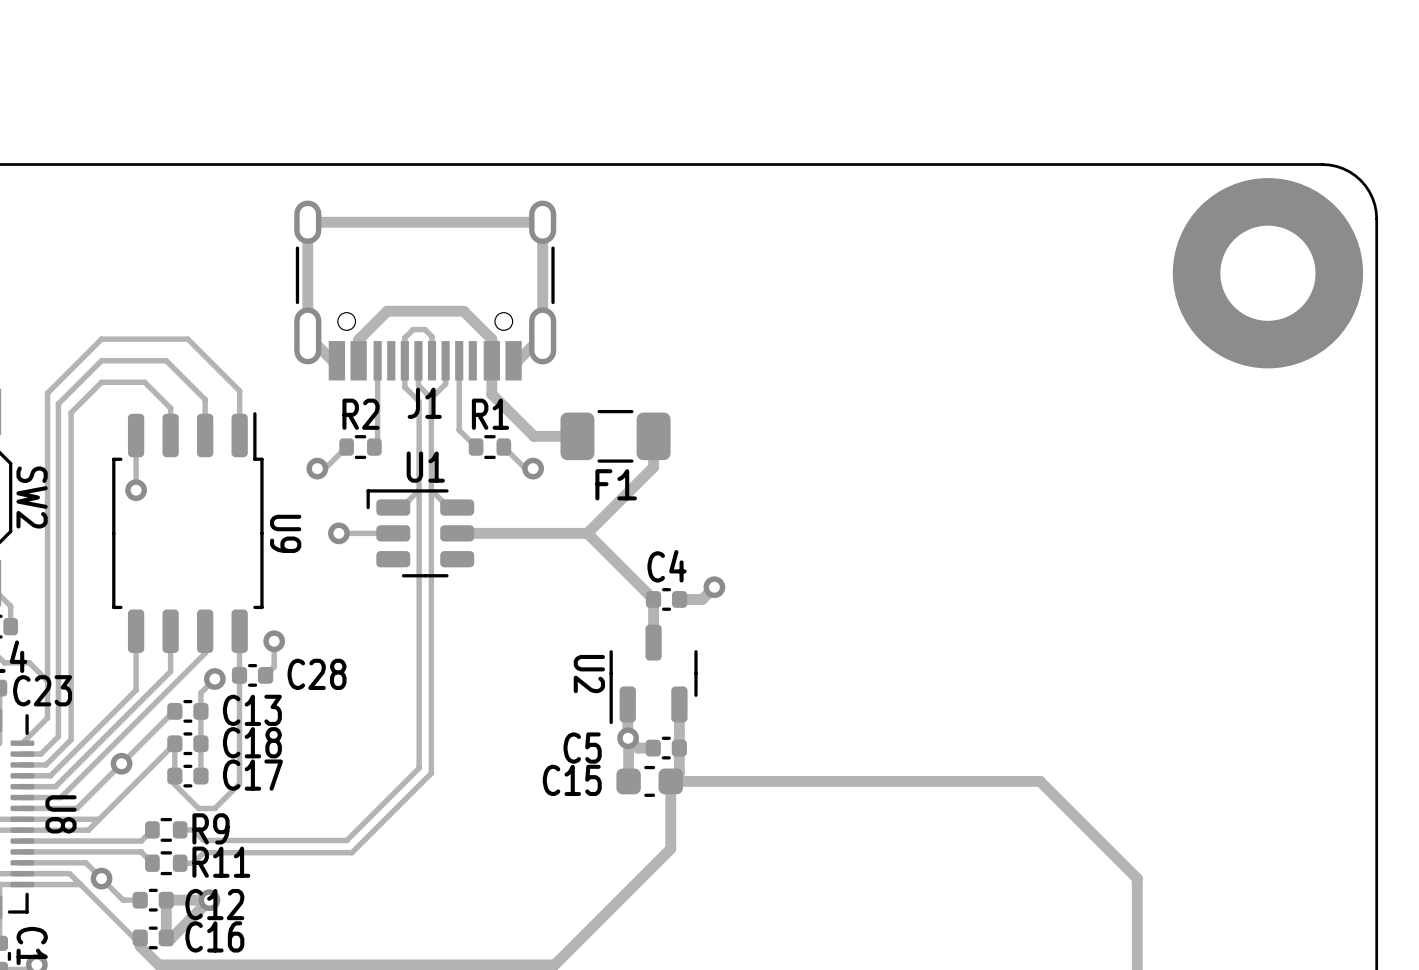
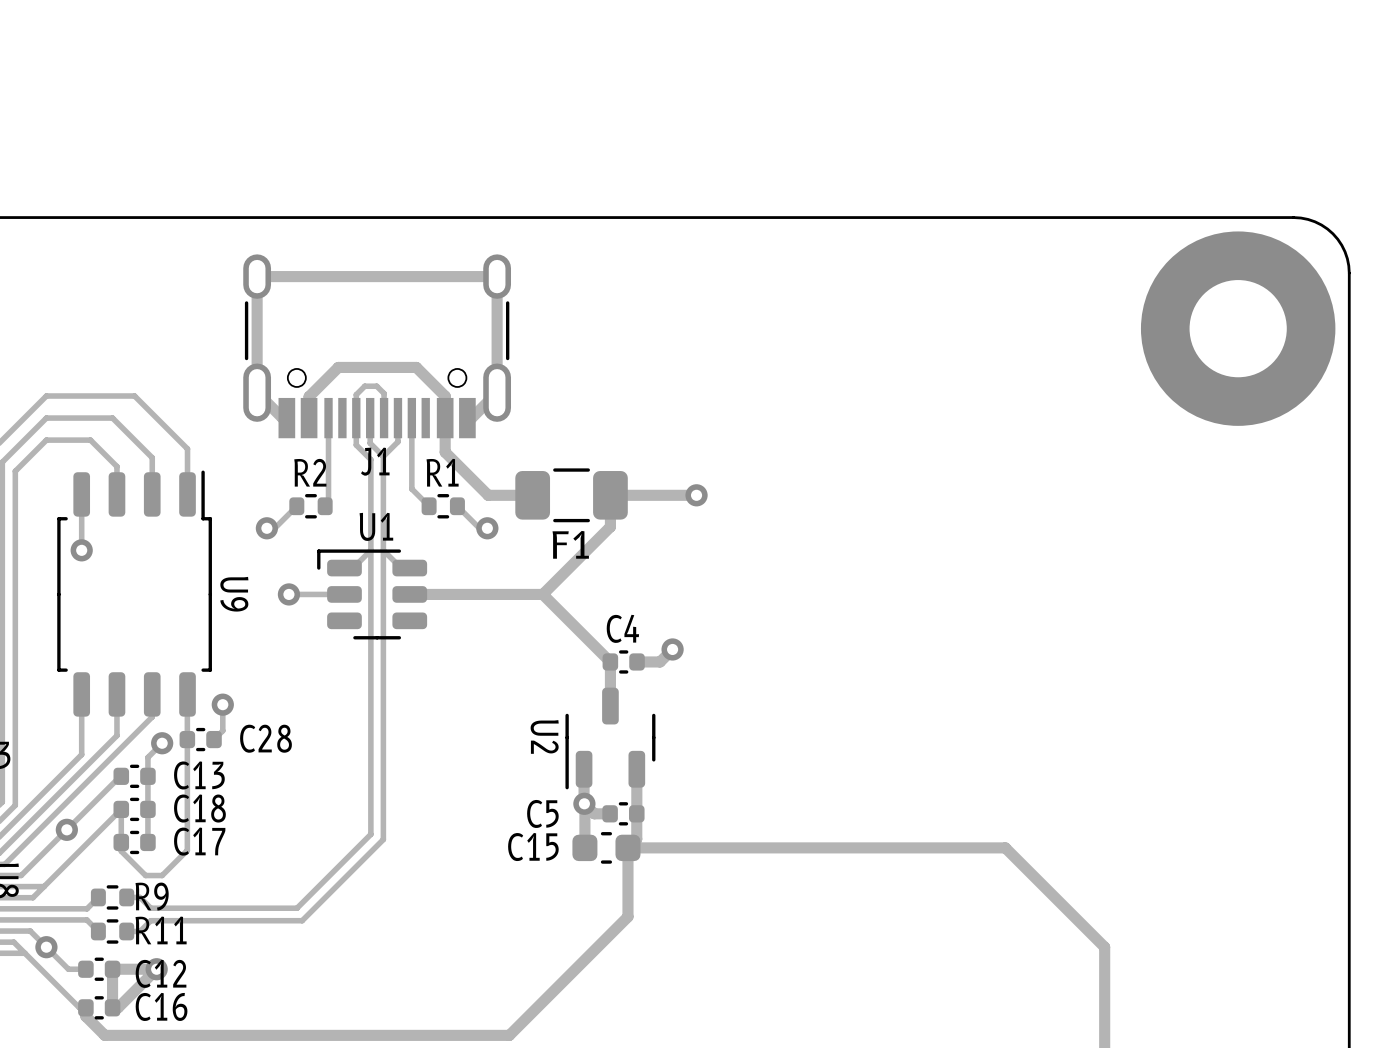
track: none -> (696, 495) (610, 495)
via: none -> (696, 495)

